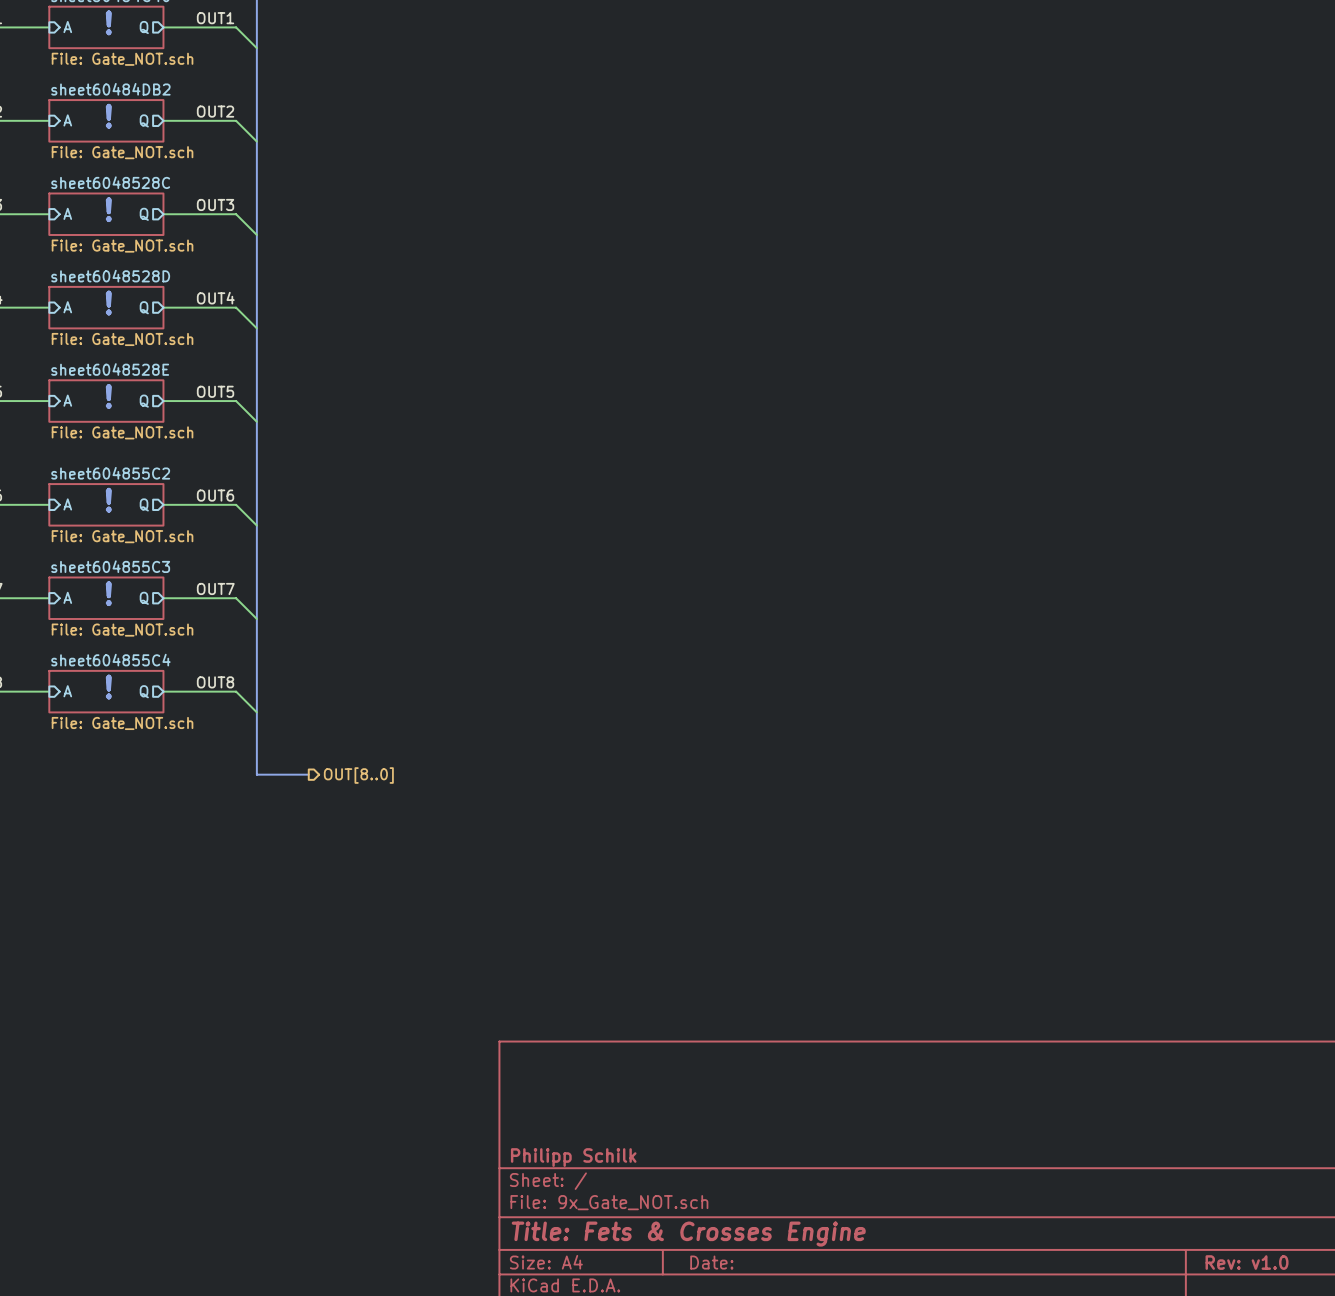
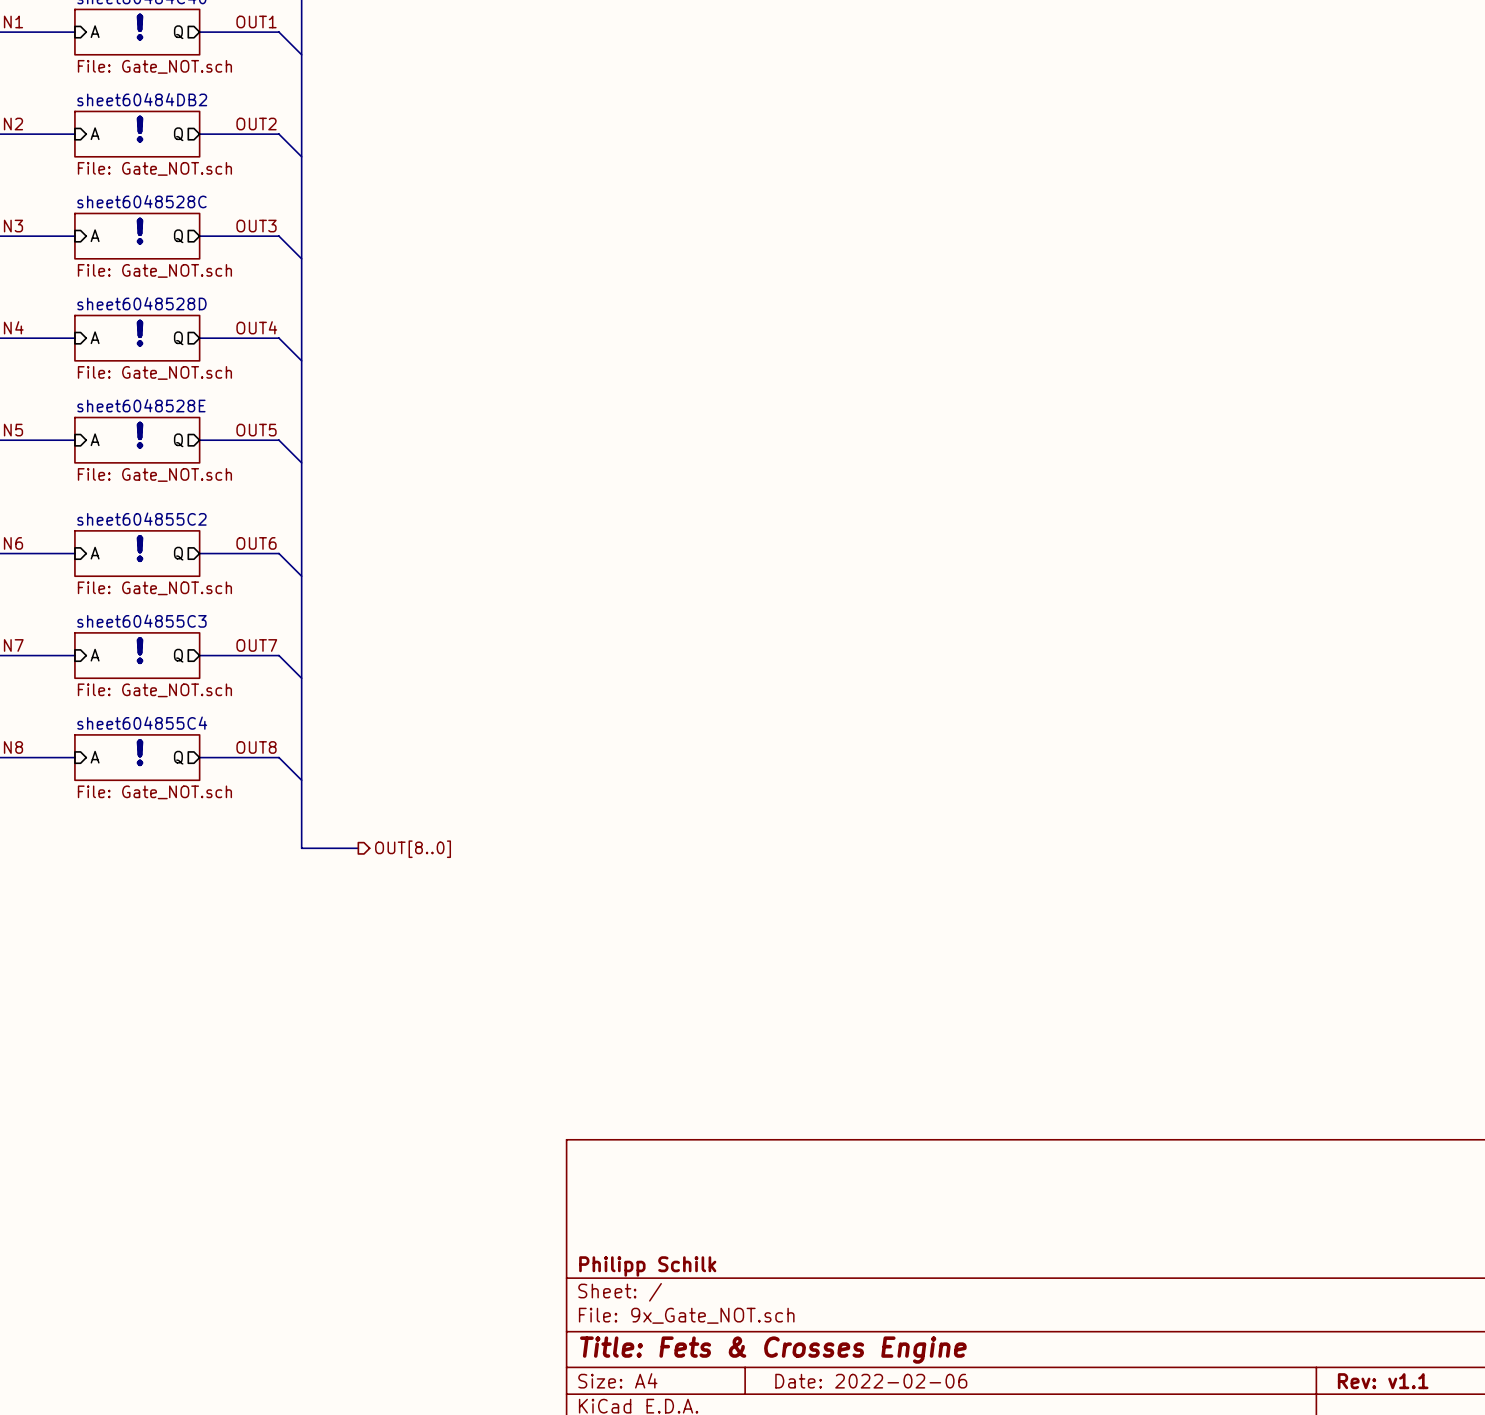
title block: Date: (711, 1262) -> Date: 2022-02-06 (871, 1381)
title block: Rev: v1.0 (1247, 1262) -> Rev: v1.1 (1383, 1381)

